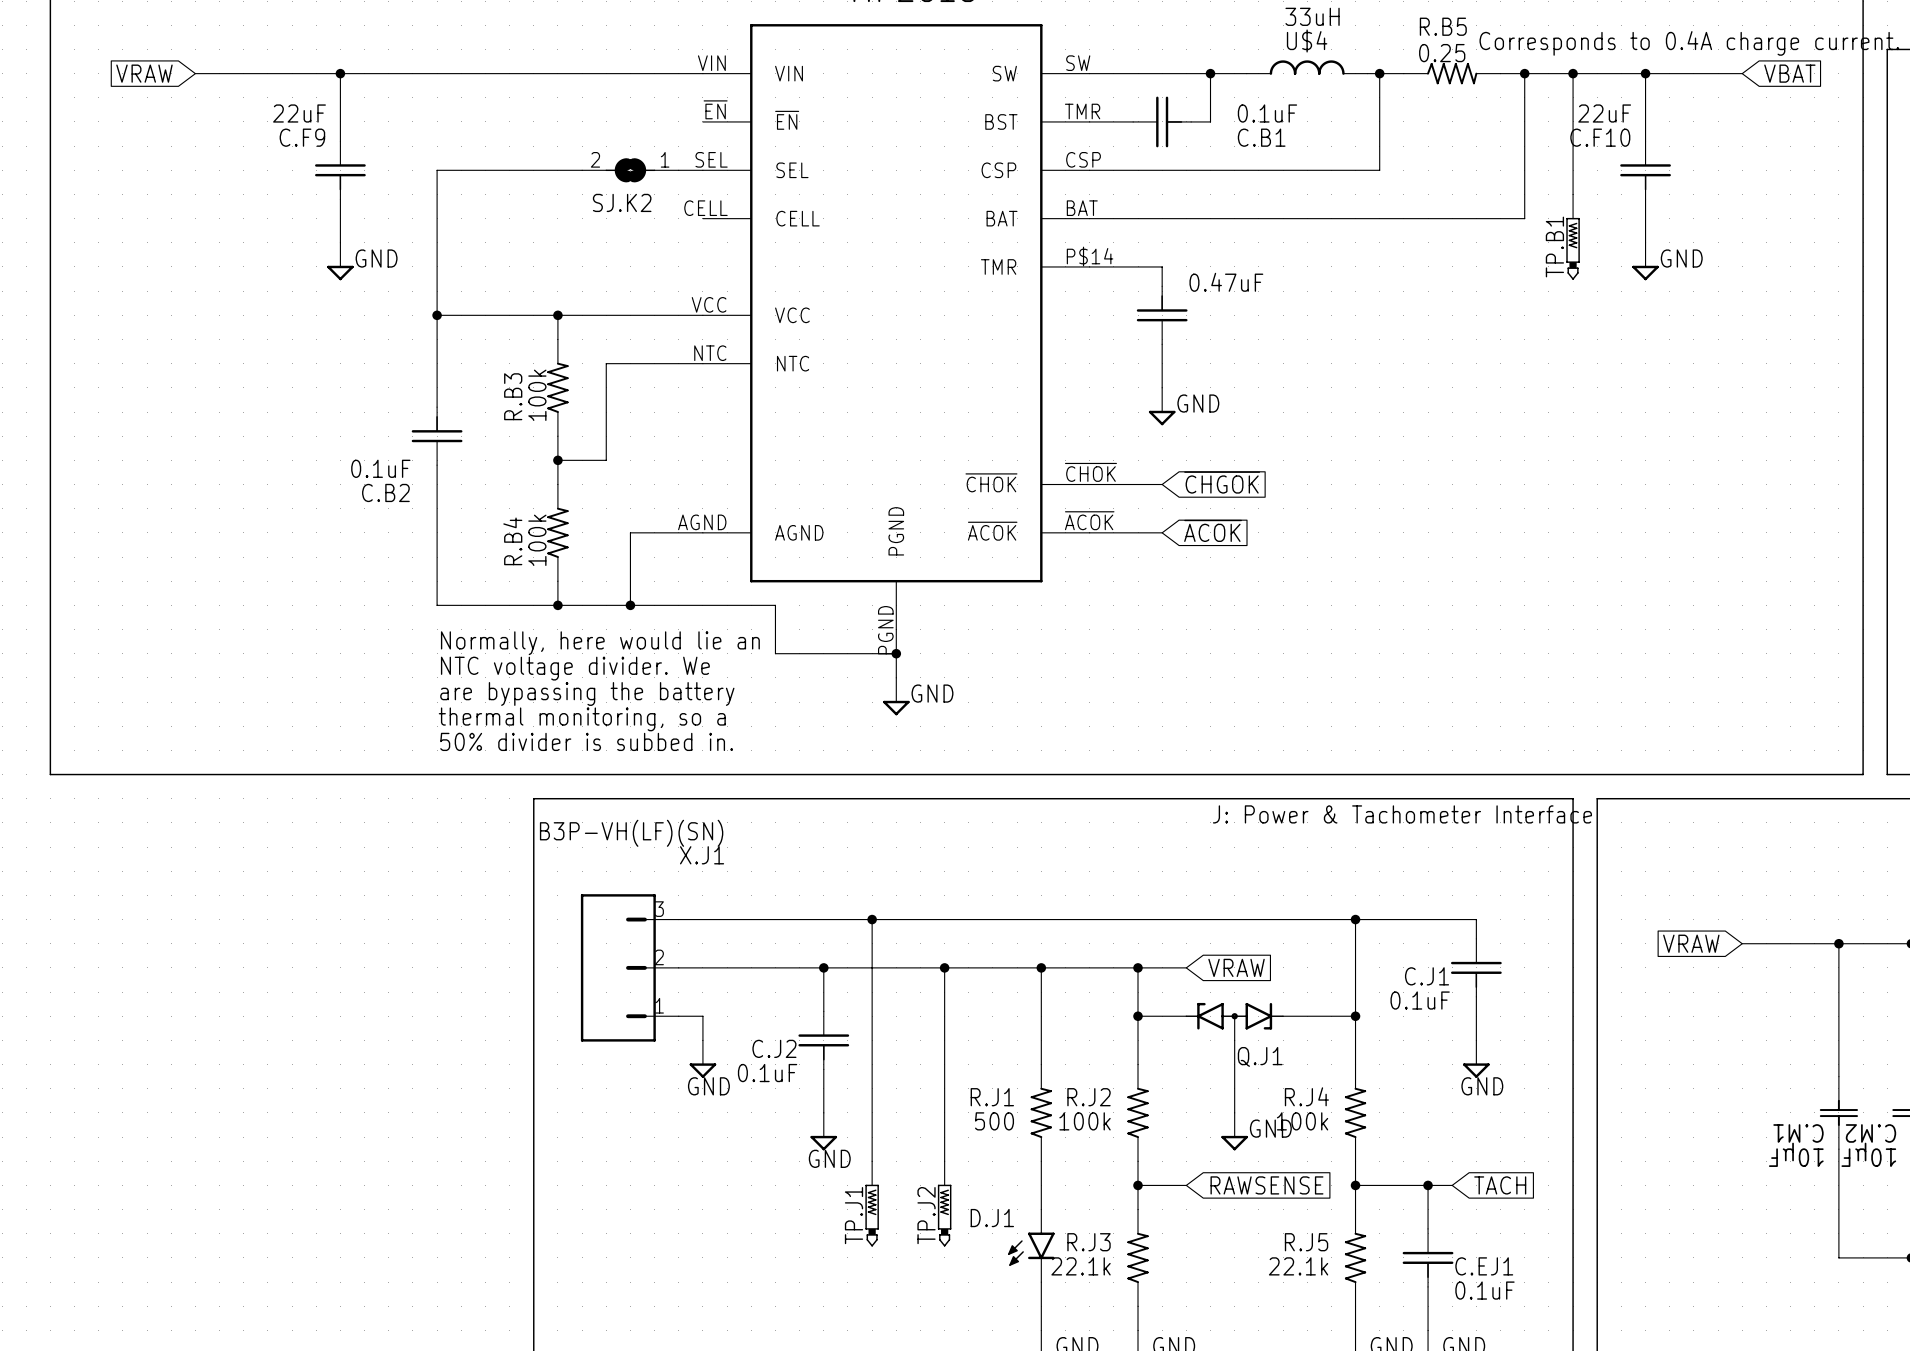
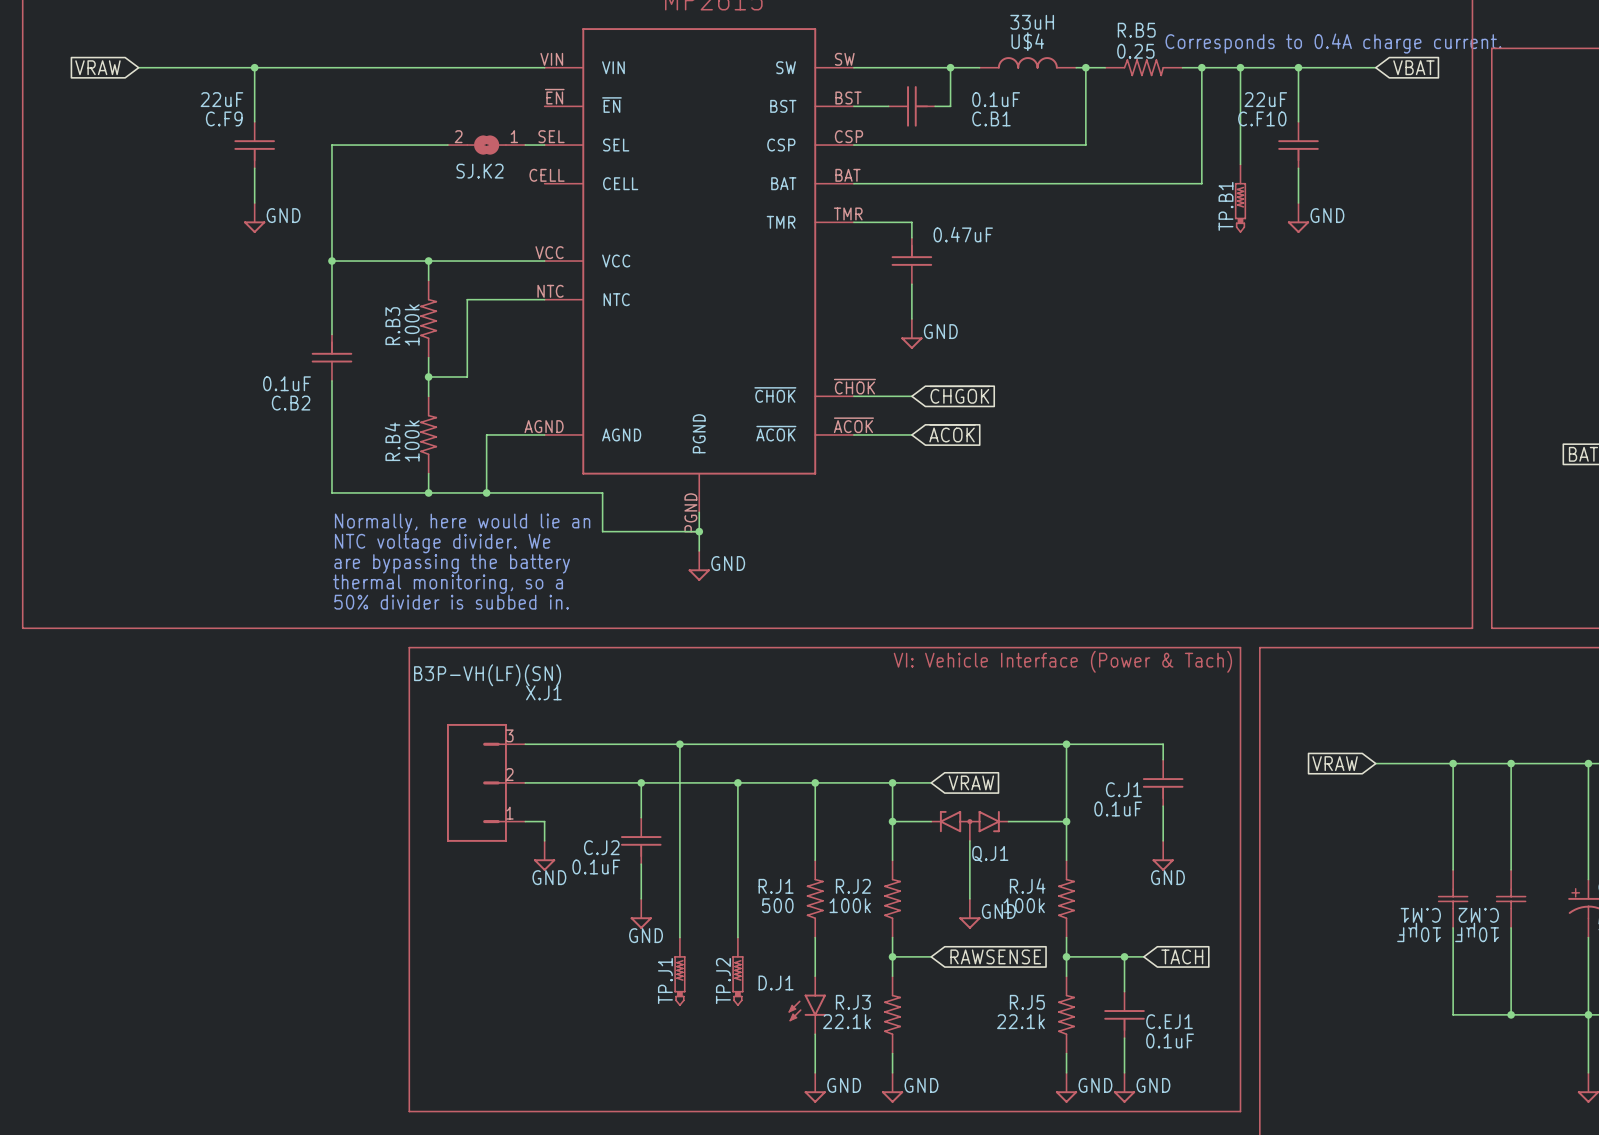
part pin number: TMR (1082, 111) -> BST (848, 98)
part pin number: P$14 (1090, 256) -> TMR (848, 213)
text: J: Power & Tachometer Interface (1402, 814) -> none
text: none -> VI: Vehicle Interface (Power & Tach) (1062, 661)

